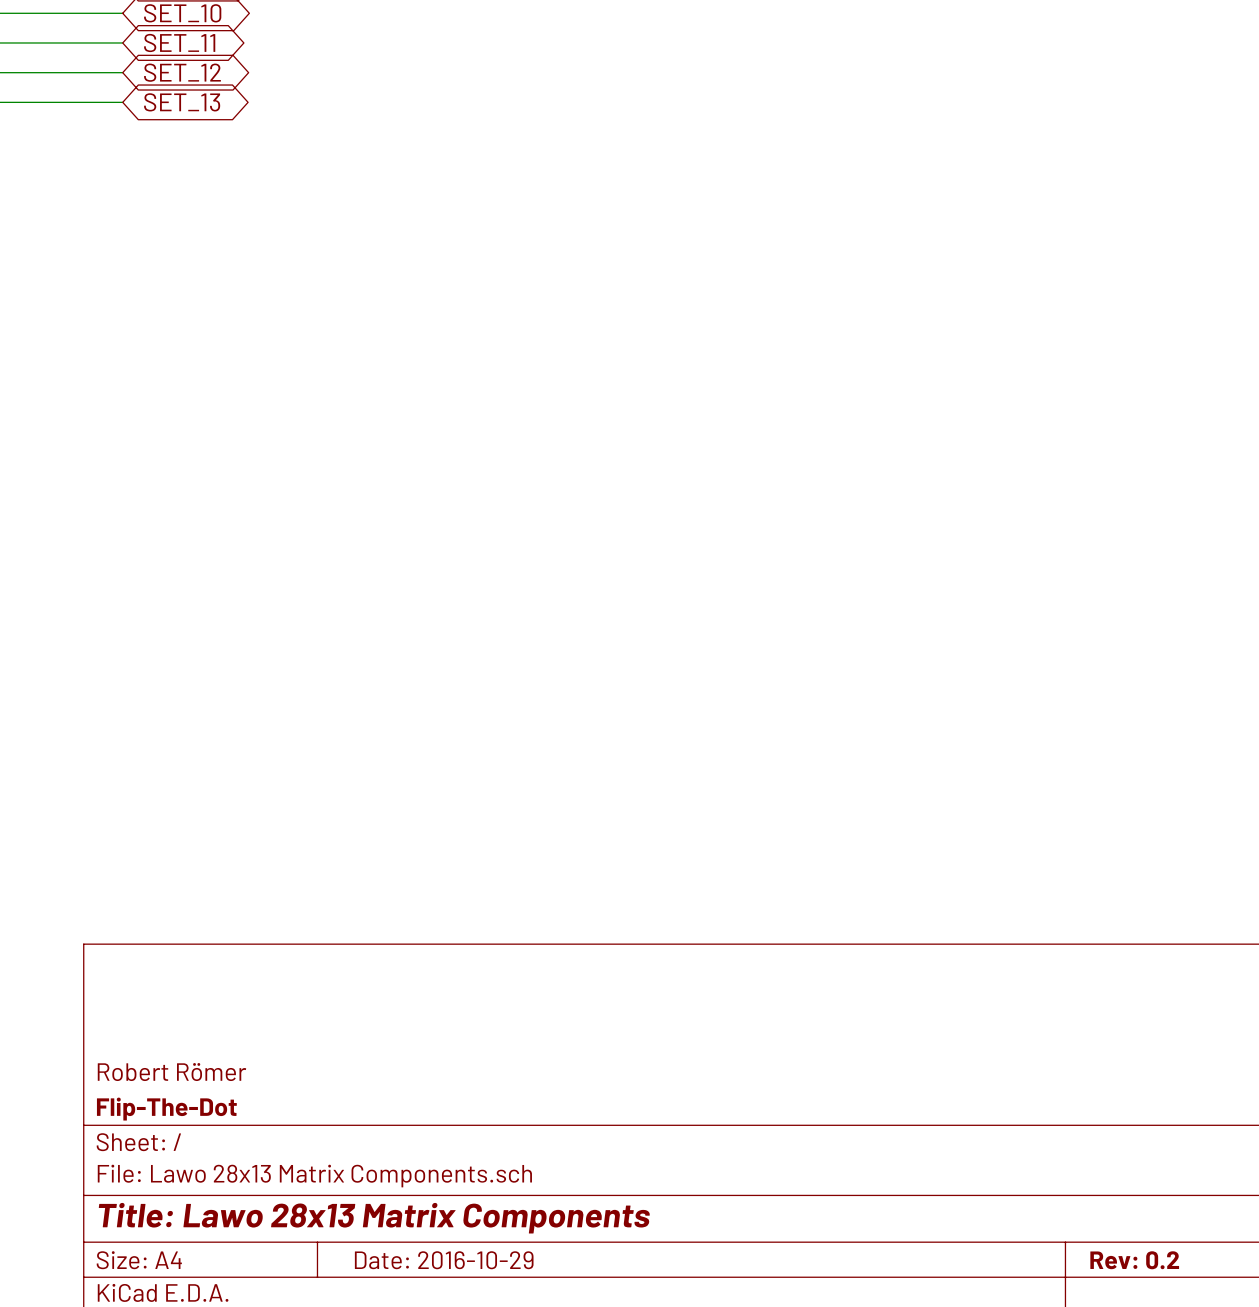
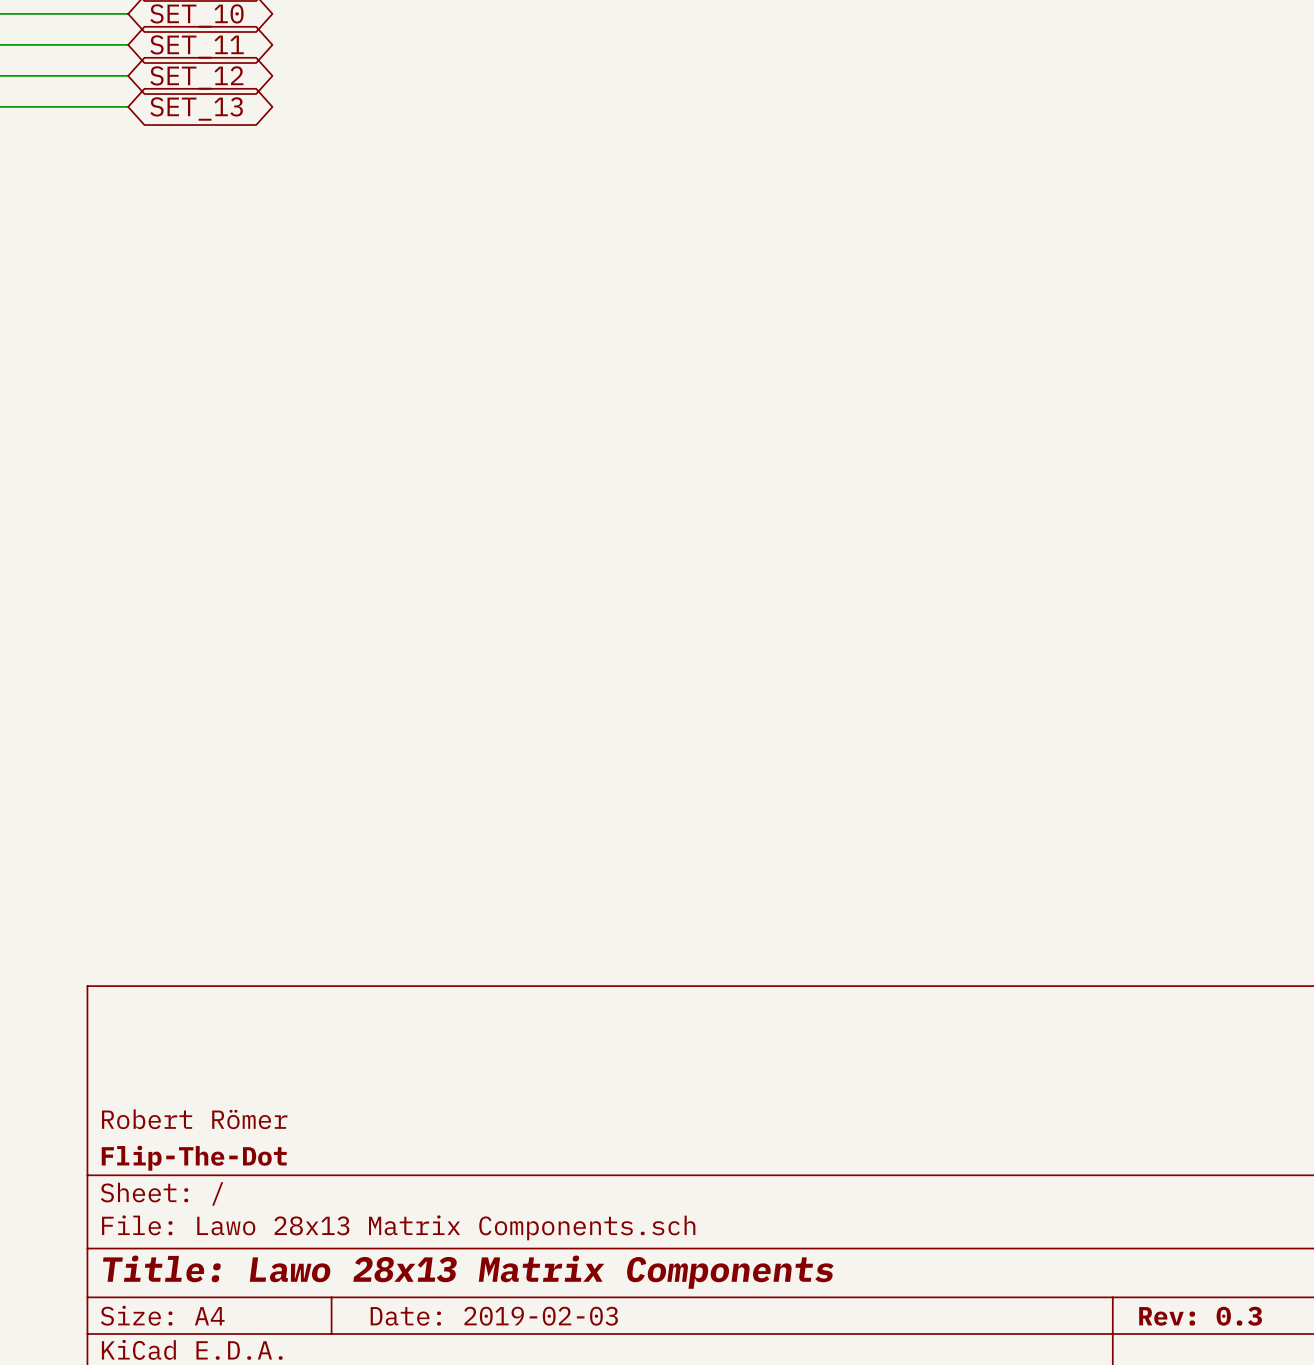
title block: Date: 2016-10-29 (444, 1260) -> Date: 2019-02-03 (494, 1316)
title block: Rev: 0.2 (1134, 1260) -> Rev: 0.3 (1200, 1316)

